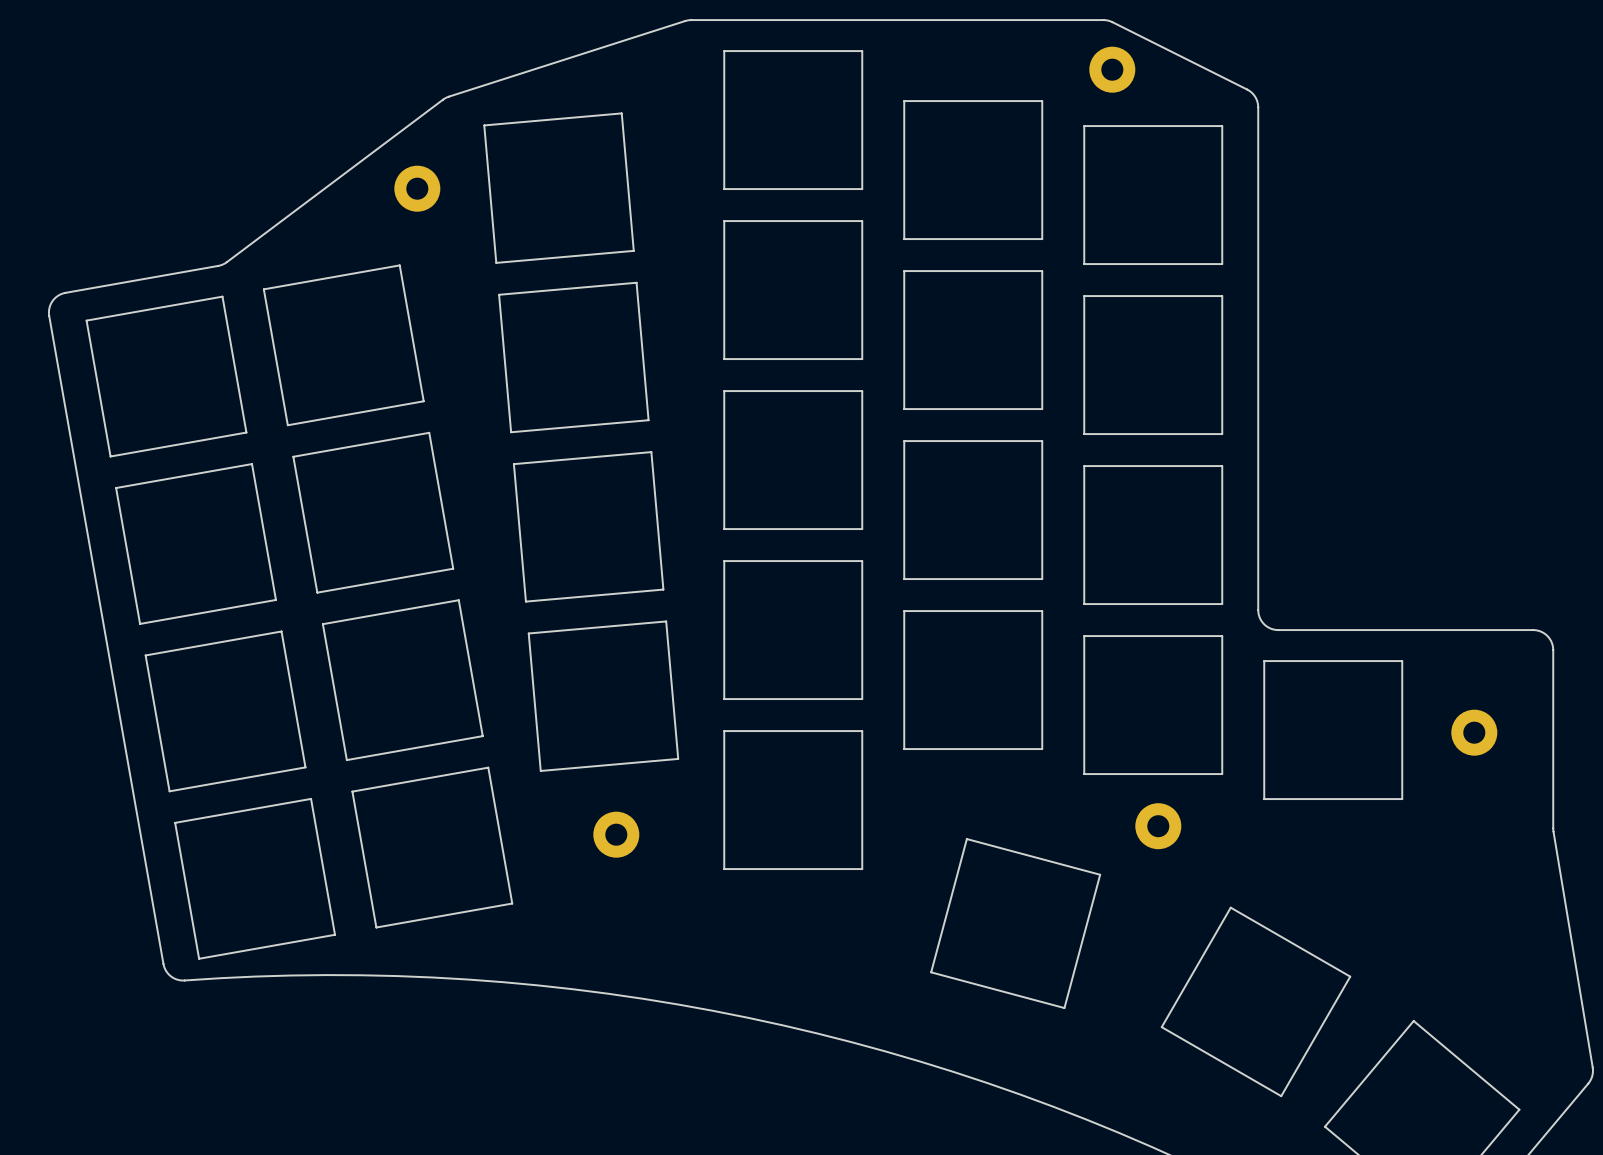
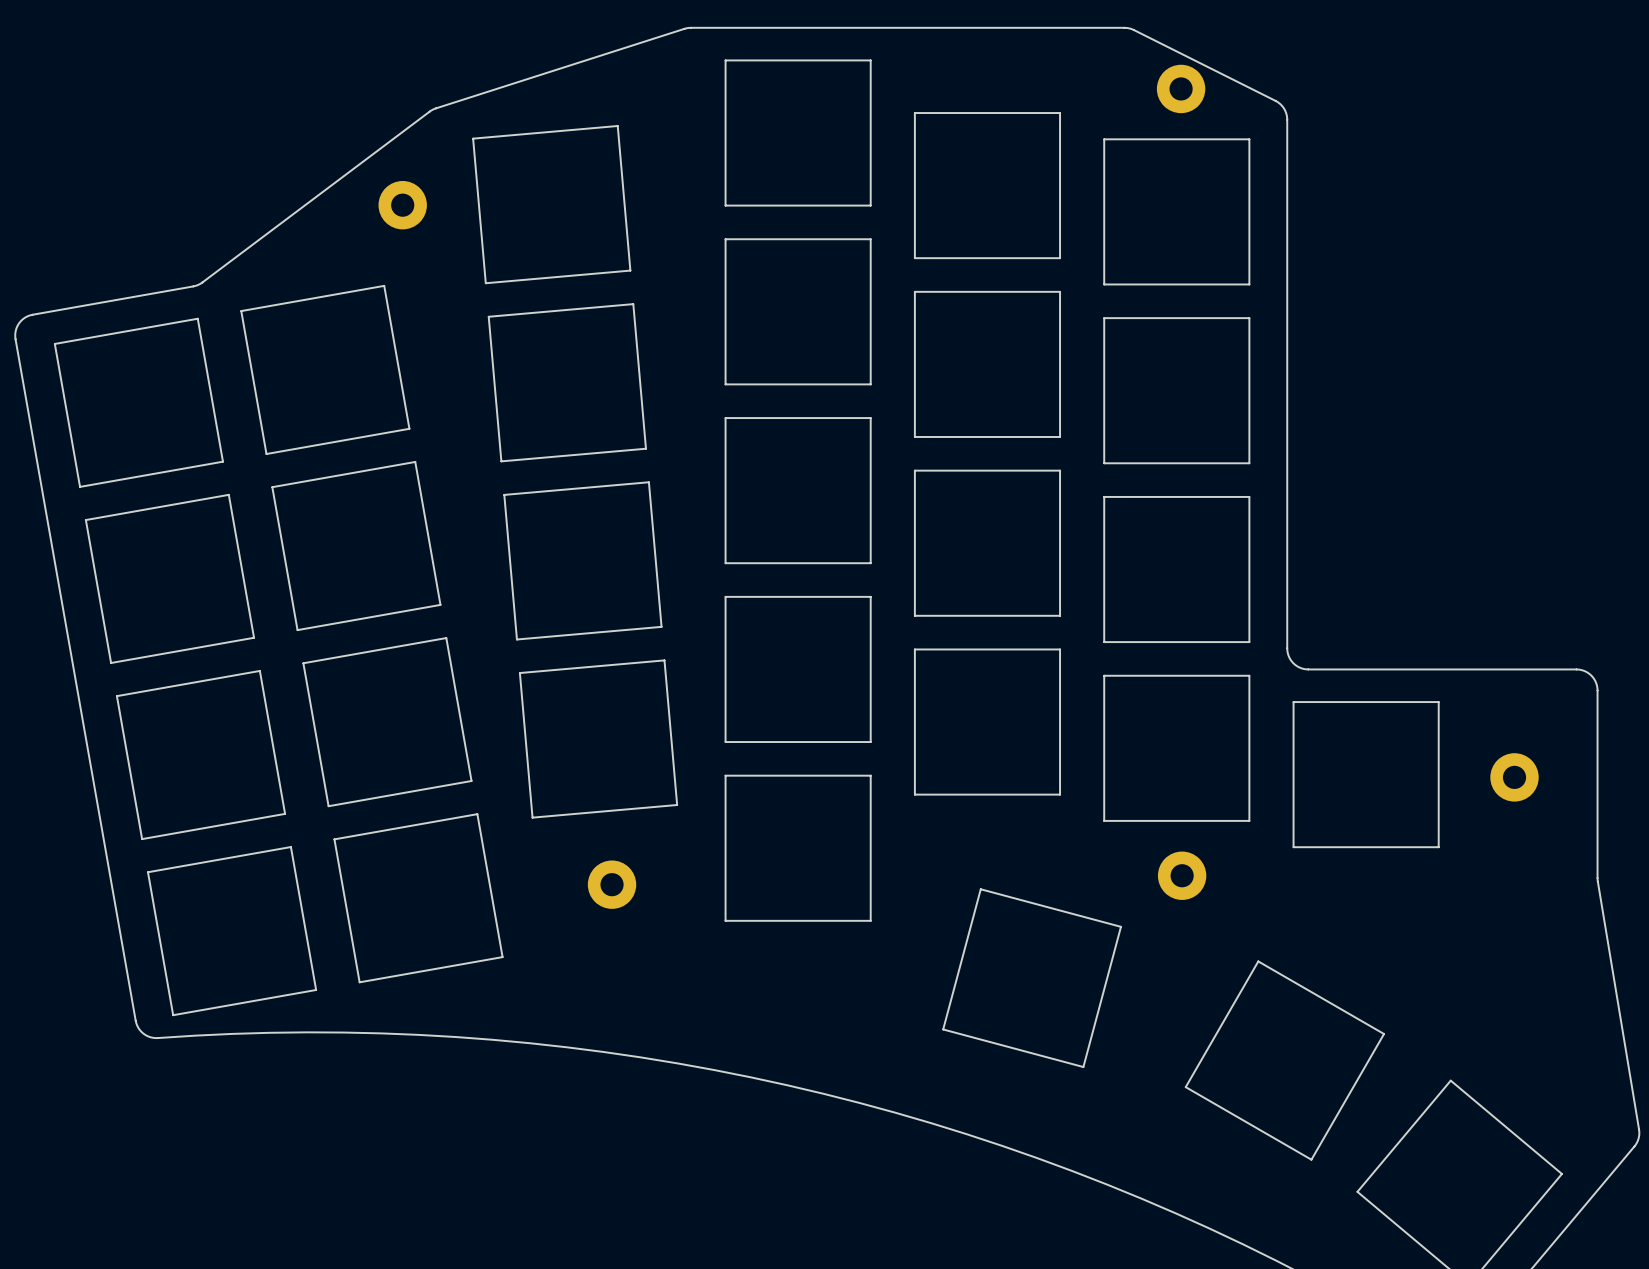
part position: (1112, 69) -> (1181, 88)

